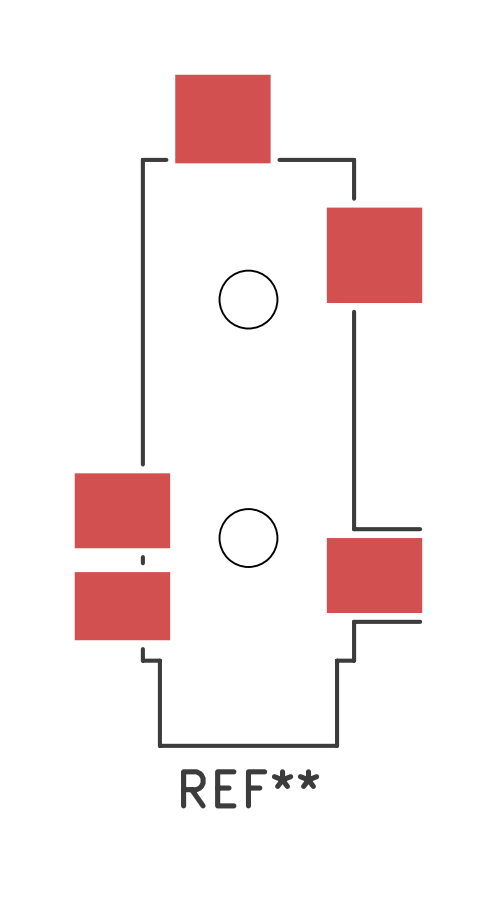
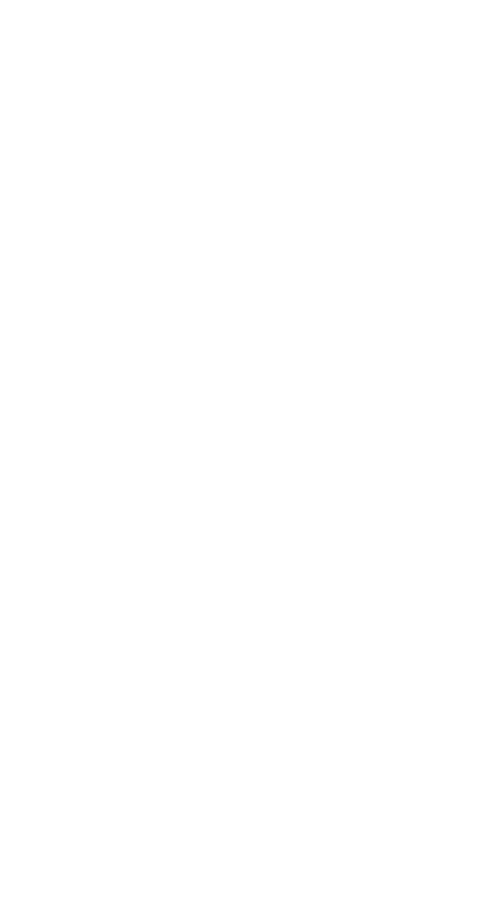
REF**: (248, 411) -> none

